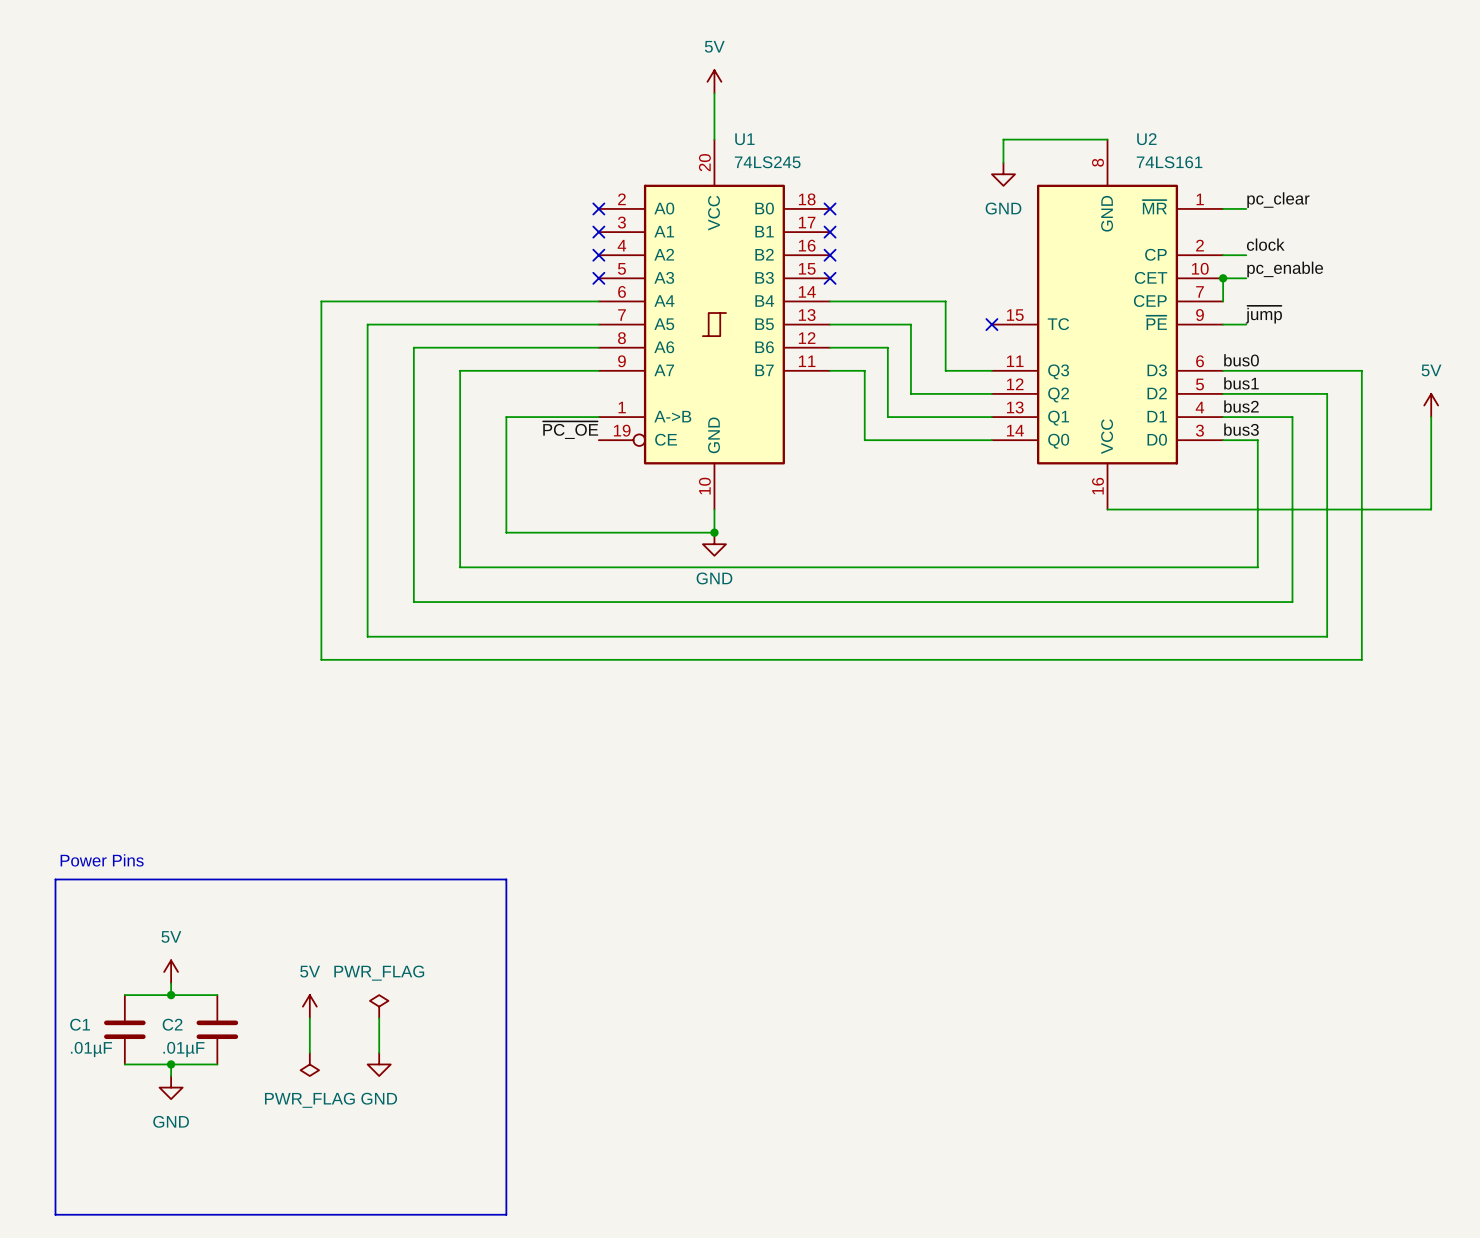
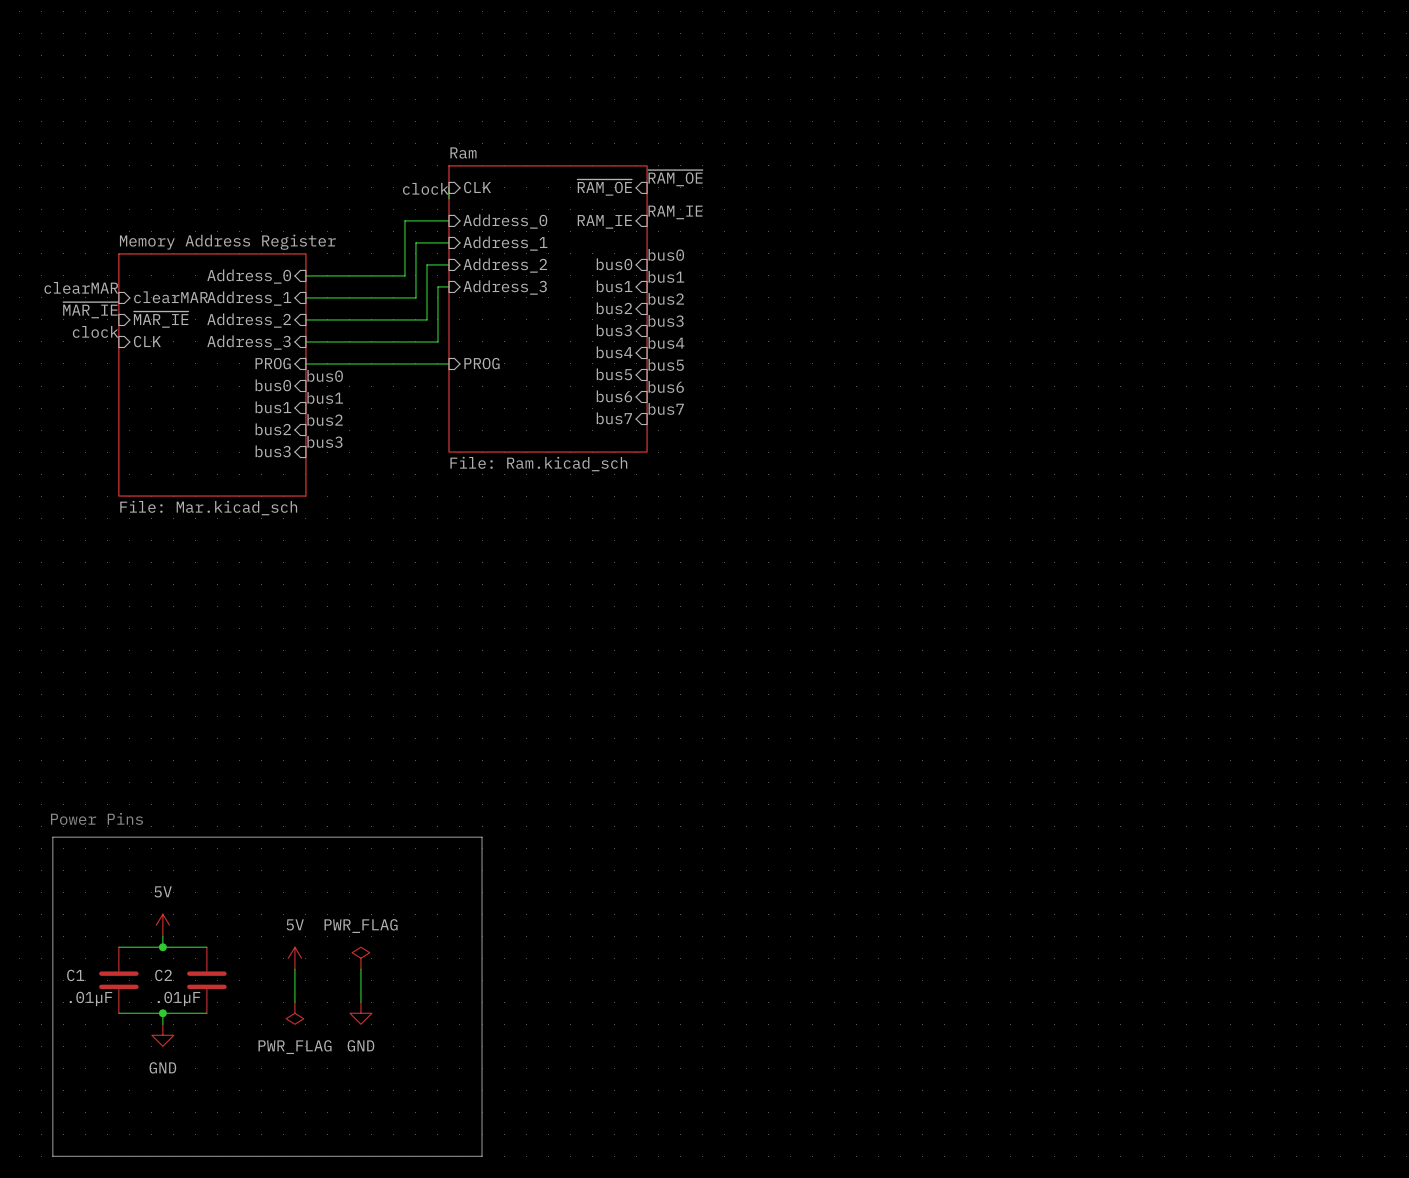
power symbol: 5V (714, 81) -> none
wire: (714, 93) (714, 139) -> none
wire: (1107, 139) (1003, 139) (1003, 162) -> none
power symbol: GND (1003, 174) -> none
label: none -> ~{RAM_OE} (675, 178)
sheet pin: none -> CLK (477, 187)
wire: none -> (448, 187) (448, 198)
sheet pin: none -> ~{RAM_OE} (604, 187)
label: none -> clock (425, 188)
label: pc_clear (1278, 200) -> none
no-connect mark: (598, 208) -> none
no-connect mark: (830, 208) -> none
wire: (1223, 208) (1246, 208) -> none
label: none -> RAM_IE (675, 212)
wire: none -> (448, 220) (404, 220) (404, 275) (305, 275)
no-connect mark: (598, 232) -> none
no-connect mark: (830, 232) -> none
sheet pin: none -> Address_0 (505, 221)
sheet pin: none -> RAM_IE (604, 221)
label: clock (1265, 244) -> none
wire: none -> (448, 242) (415, 242) (415, 297) (305, 297)
no-connect mark: (598, 255) -> none
no-connect mark: (830, 255) -> none
wire: (1223, 255) (1246, 255) -> none
sheet pin: none -> Address_1 (505, 243)
label: none -> bus0 (666, 254)
label: pc_enable (1285, 269) -> none
sheet pin: none -> bus0 (614, 264)
wire: none -> (448, 264) (426, 264) (426, 319) (305, 319)
no-connect mark: (598, 278) -> none
no-connect mark: (830, 278) -> none
junction: (1223, 278) -> none
wire: (1246, 278) (1223, 278) (1223, 301) -> none
sheet pin: none -> Address_2 (505, 265)
sheet pin: none -> Address_0 (249, 276)
label: none -> bus1 (666, 276)
sheet pin: none -> bus1 (614, 286)
wire: (460, 301) (321, 301) (321, 659) (1361, 659) (1361, 370) (1223, 370) -> (437, 286) (437, 341) (305, 341)
wire: (471, 301) (598, 301) -> none
wire: (830, 301) (945, 301) (945, 370) (991, 370) -> none
label: none -> clearMAR (81, 287)
sheet pin: none -> Address_3 (505, 287)
sheet pin: none -> clearMAR (170, 297)
sheet pin: none -> Address_1 (249, 298)
label: none -> bus2 (666, 298)
label: ~{jump} (1263, 314) -> none
sheet pin: none -> bus2 (614, 308)
sheet Ram: none -> File: Ram.kicad_sch (548, 308)
wire: (598, 324) (367, 324) (367, 636) (1327, 636) (1327, 393) (1223, 393) -> none
U1: 74LS245 (714, 324) -> none
wire: (830, 324) (910, 324) (910, 393) (991, 393) -> none
no-connect mark: (991, 324) -> none
U2: 74LS161 (1107, 324) -> none
wire: (1223, 324) (1246, 324) -> none
label: none -> ~{MAR_IE} (90, 310)
sheet pin: none -> ~{MAR_IE} (161, 319)
sheet pin: none -> Address_2 (249, 320)
label: none -> bus3 (666, 320)
wire: (598, 347) (413, 347) (413, 602) (1292, 602) (1292, 417) (1223, 417) -> none
sheet pin: none -> bus3 (614, 330)
wire: (830, 347) (887, 347) (887, 417) (991, 417) -> none
label: none -> clock (95, 331)
sheet pin: none -> CLK (147, 341)
sheet pin: none -> Address_3 (248, 342)
label: none -> bus4 (666, 342)
label: bus0 (1241, 360) -> none
wire: (598, 370) (460, 370) (460, 567) (1257, 567) (1257, 440) (1223, 440) -> none
sheet pin: none -> bus4 (614, 352)
wire: (830, 370) (864, 370) (864, 440) (991, 440) -> none
sheet pin: none -> PROG (273, 363)
sheet pin: none -> PROG (481, 363)
wire: none -> (305, 363) (448, 363)
label: none -> bus5 (666, 364)
label: bus1 (1241, 383) -> none
sheet Memory Address Register: none -> File: Mar.kicad_sch (212, 374)
sheet pin: none -> bus5 (614, 374)
label: none -> bus0 (325, 375)
sheet pin: none -> bus0 (273, 385)
power symbol: 5V (1431, 405) -> none
label: none -> bus6 (666, 386)
label: bus2 (1241, 406) -> none
sheet pin: none -> bus6 (614, 396)
wire: (598, 417) (506, 417) (506, 532) (714, 532) (714, 509) -> none
wire: (1431, 417) (1431, 509) (1107, 509) -> none
label: none -> bus1 (325, 397)
sheet pin: none -> bus1 (273, 407)
label: none -> bus7 (666, 408)
label: bus3 (1241, 429) -> none
label: ~{PC_OE} (570, 430) -> none
sheet pin: none -> bus7 (614, 418)
label: none -> bus2 (325, 419)
sheet pin: none -> bus2 (273, 429)
label: none -> bus3 (324, 441)
sheet pin: none -> bus3 (273, 451)
junction: (714, 532) -> none
power symbol: GND (714, 544) -> none

